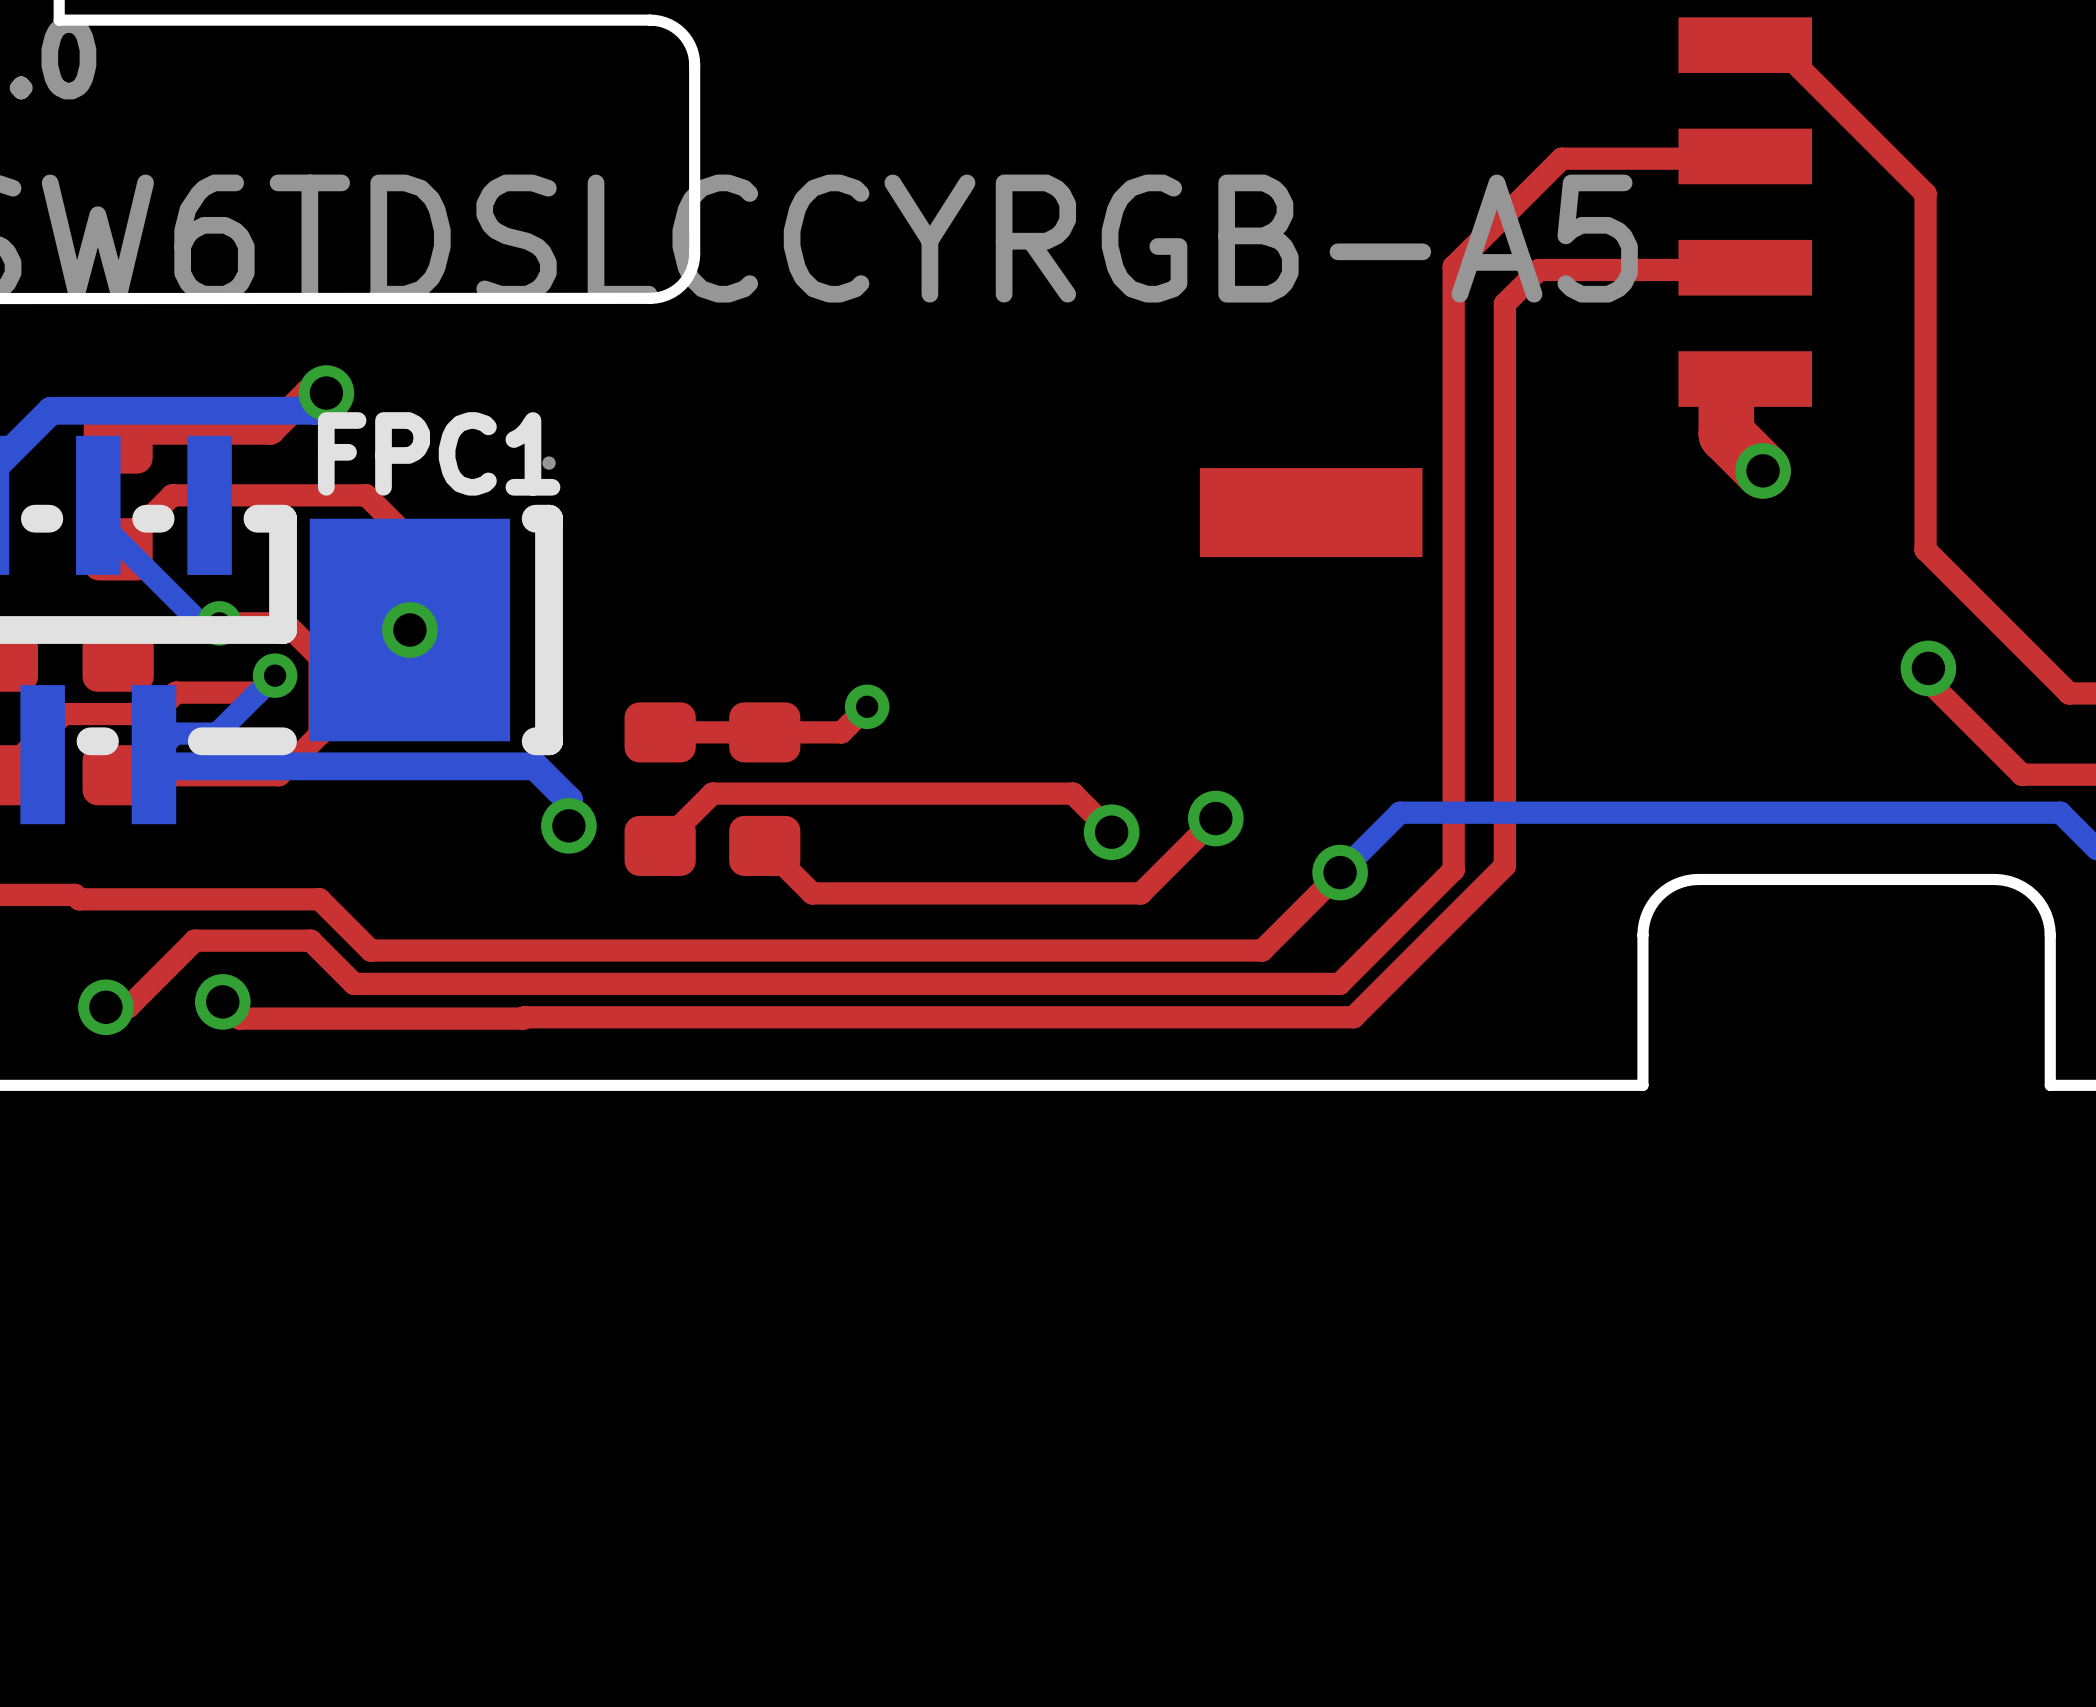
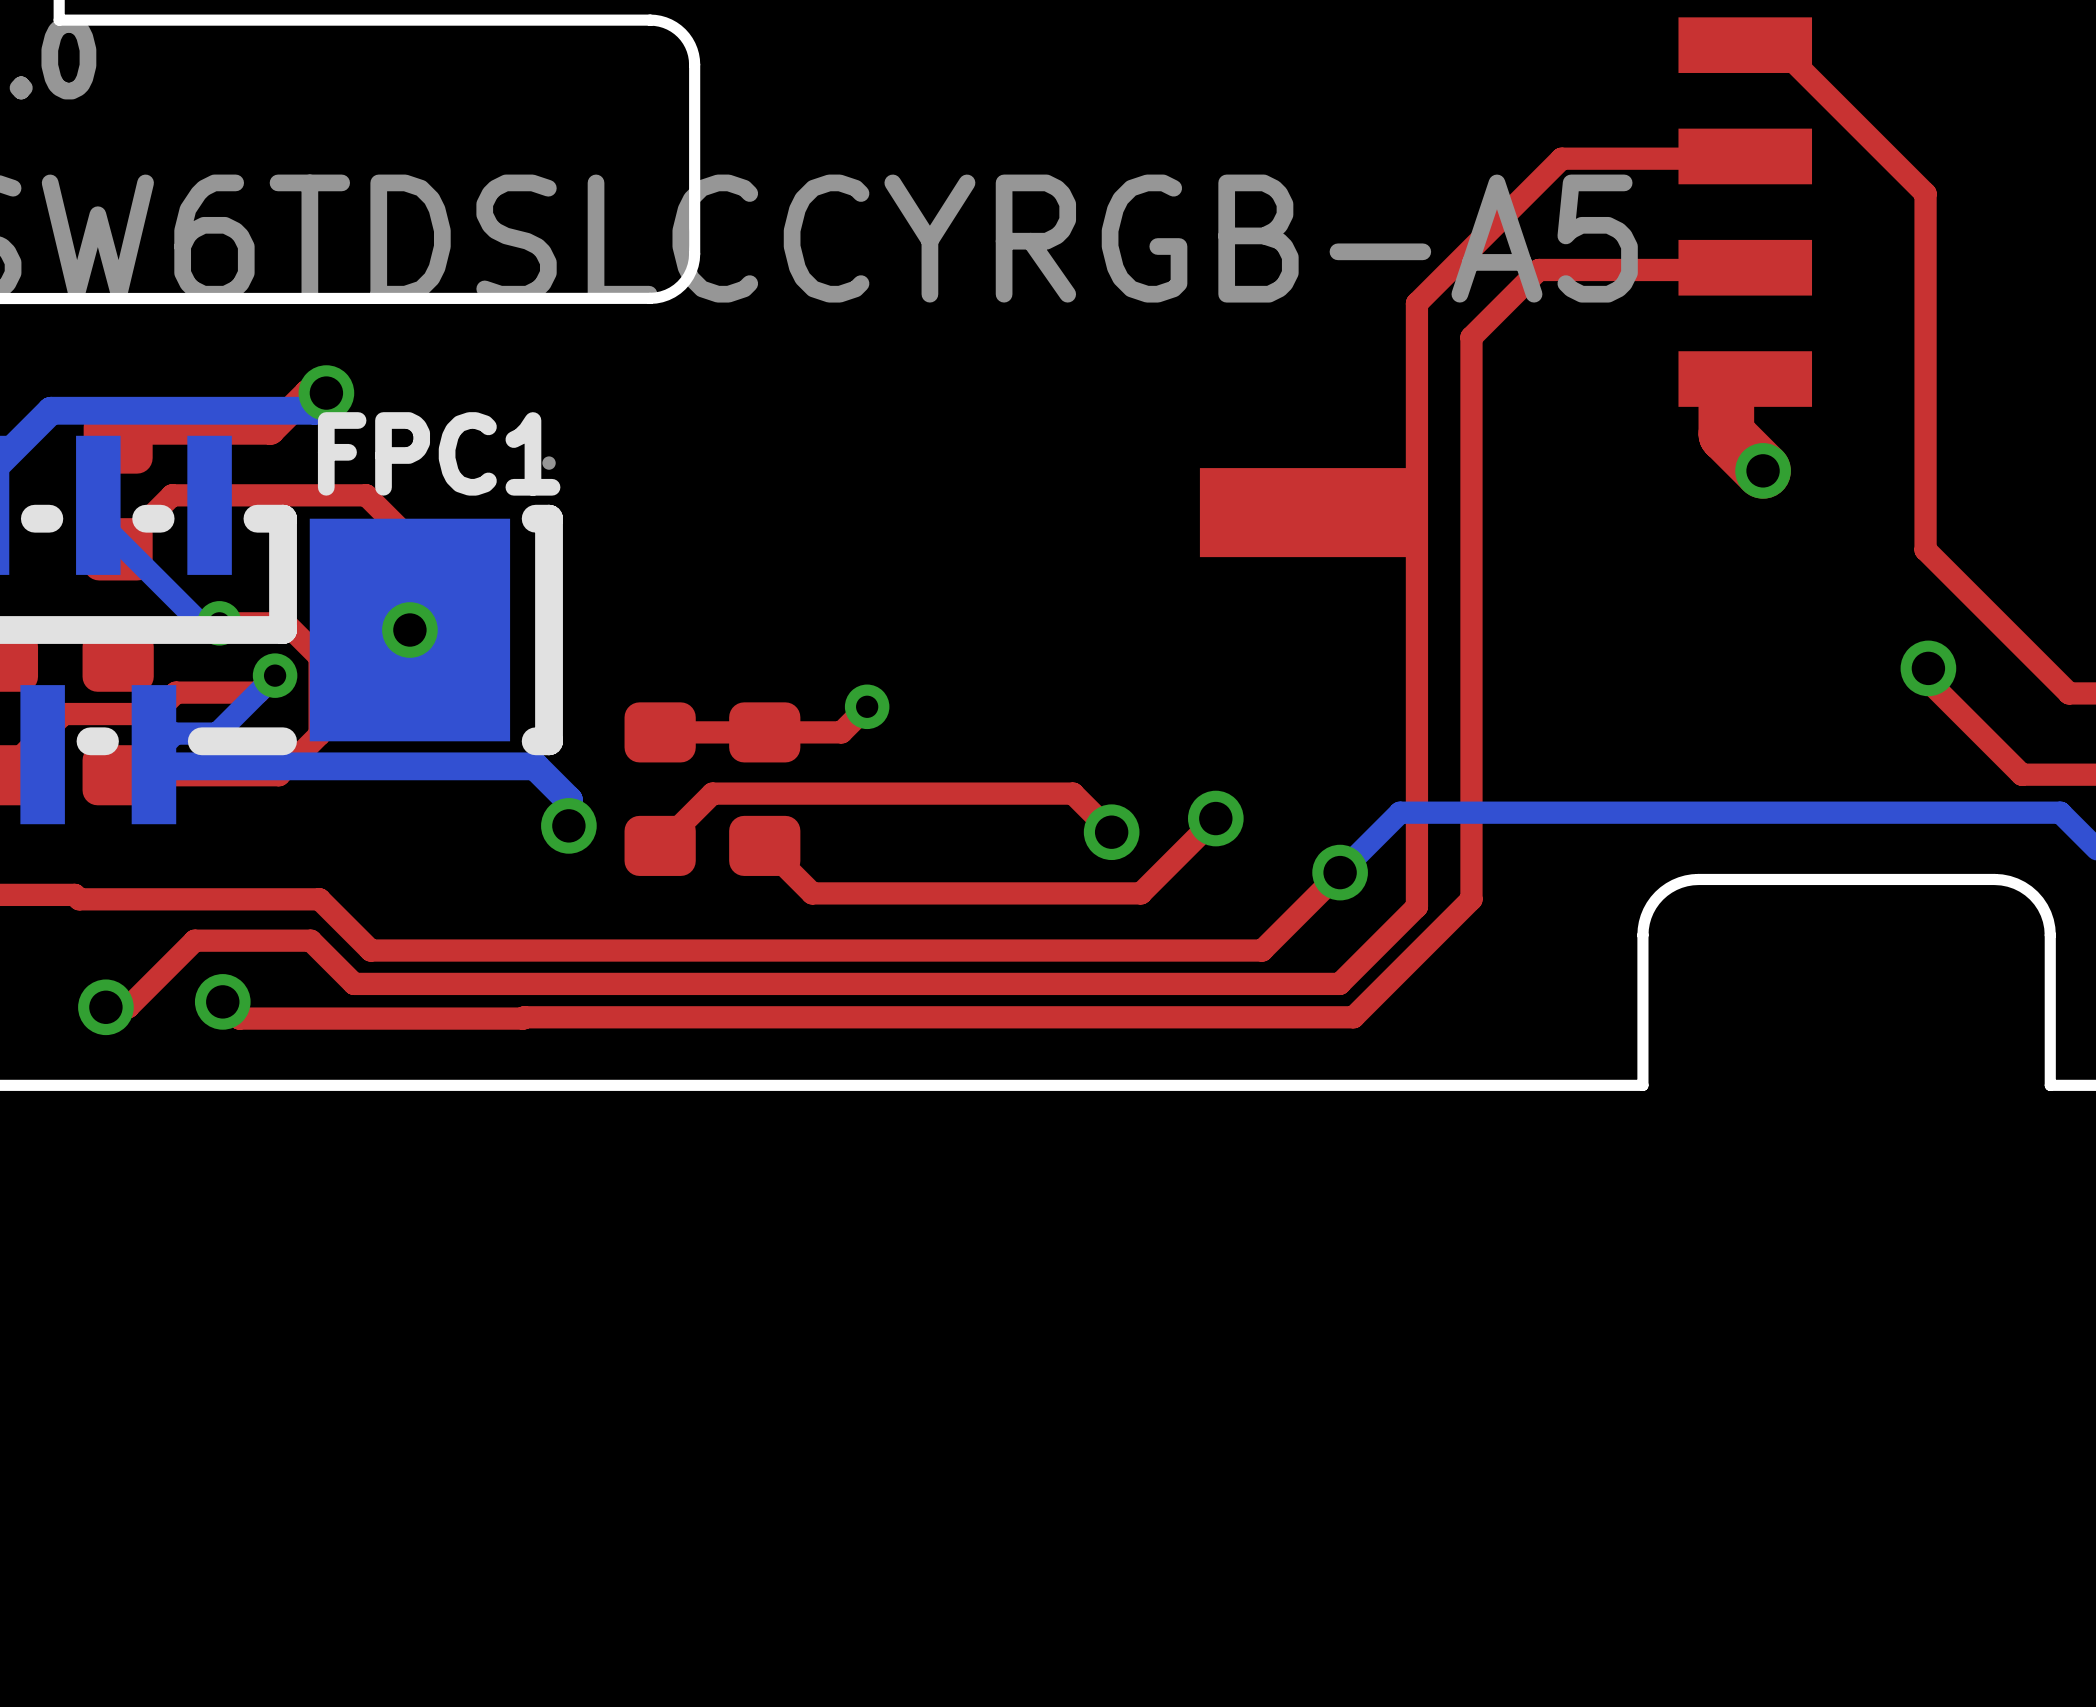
top track: (1453, 266) (1453, 869) (1416, 906) -> (1453, 266) (1416, 303) (1416, 906)
top track: (1504, 303) (1504, 865) (1471, 899) -> (1504, 303) (1471, 337) (1471, 899)

